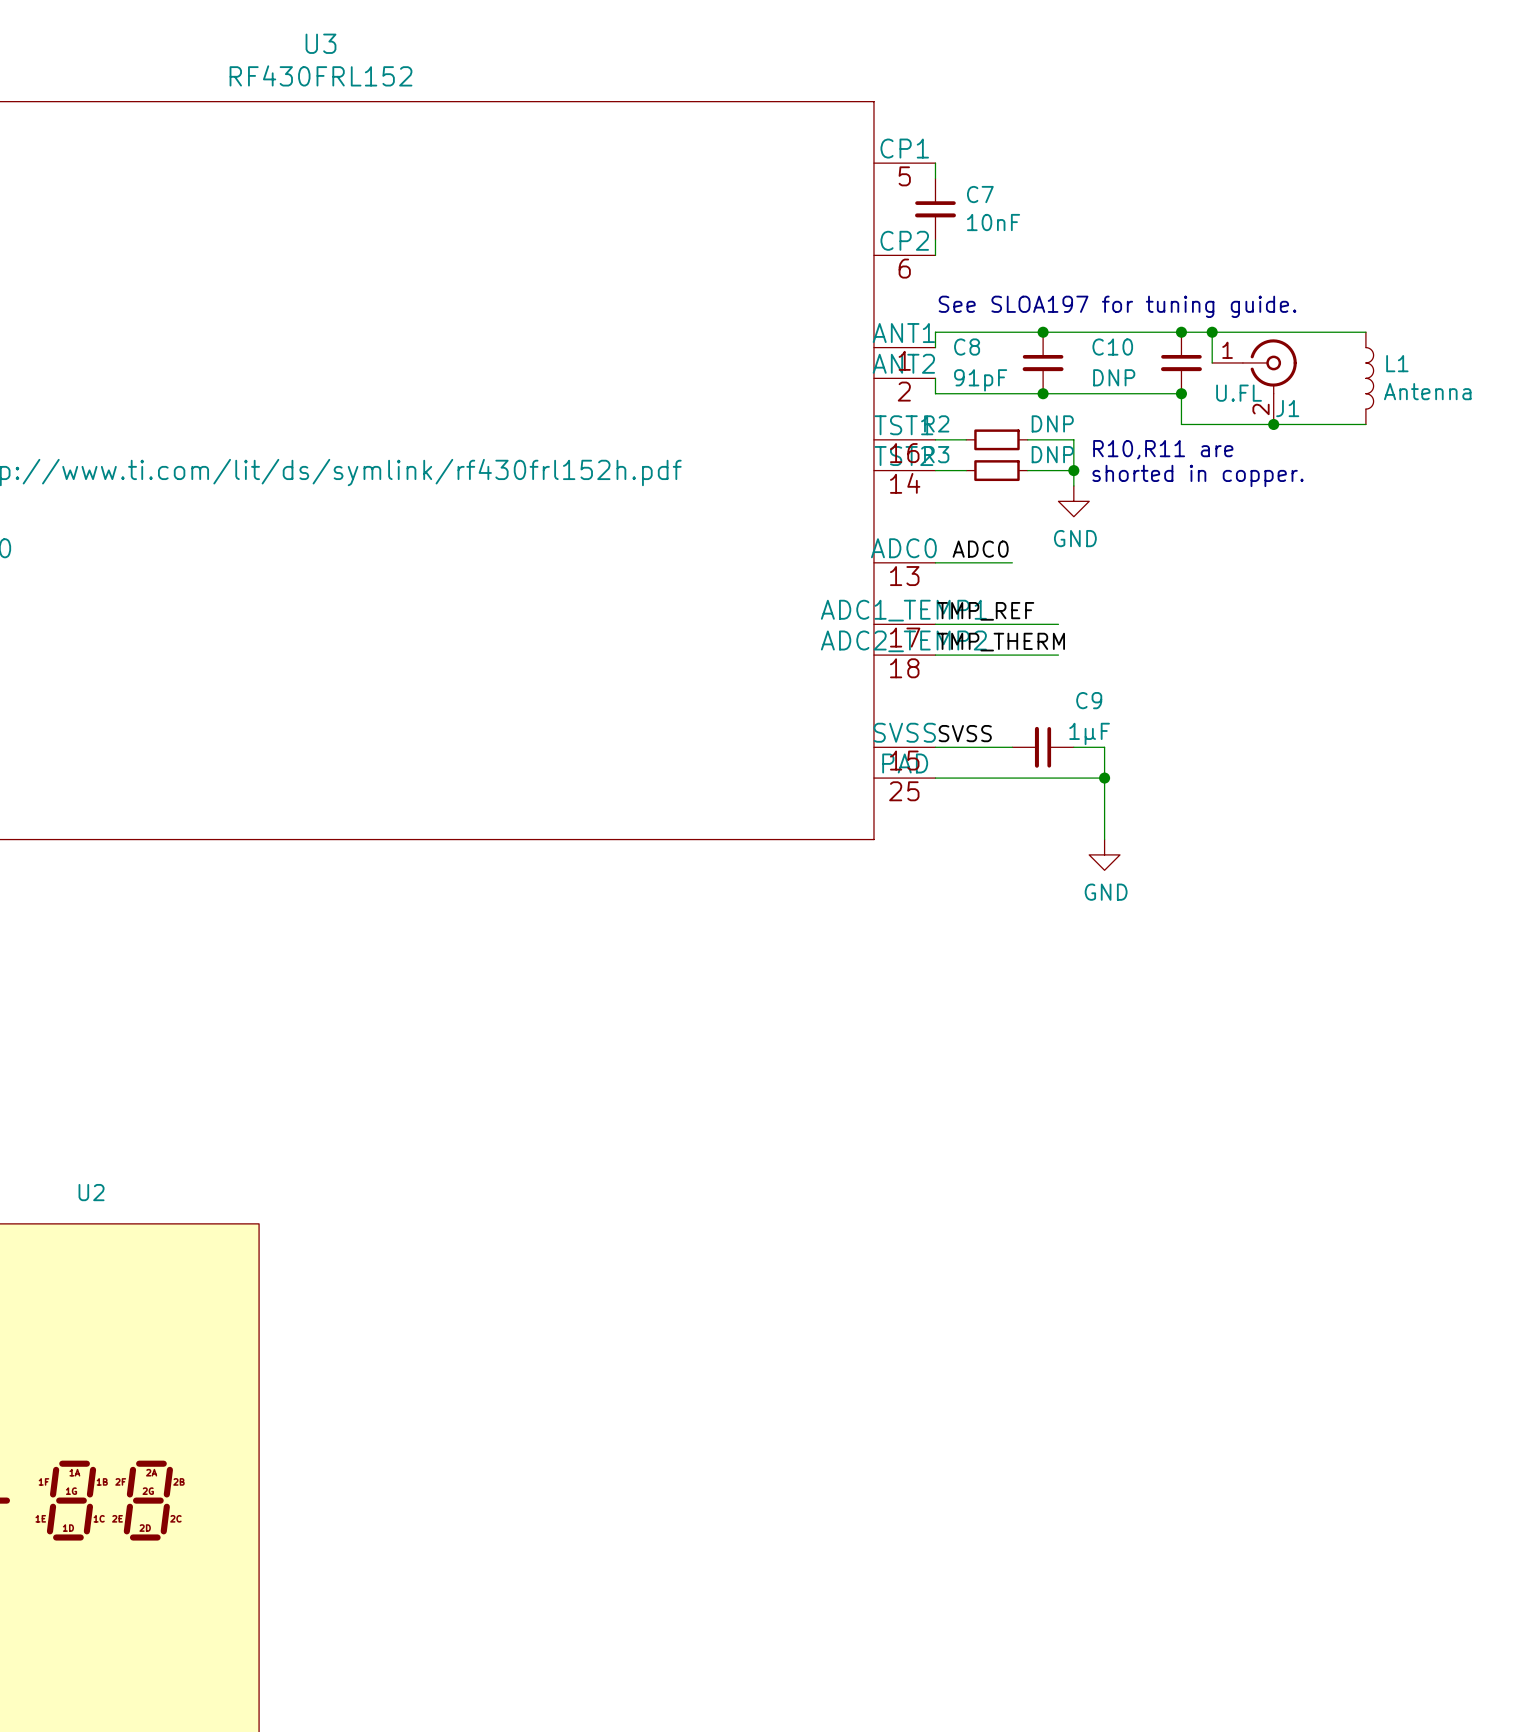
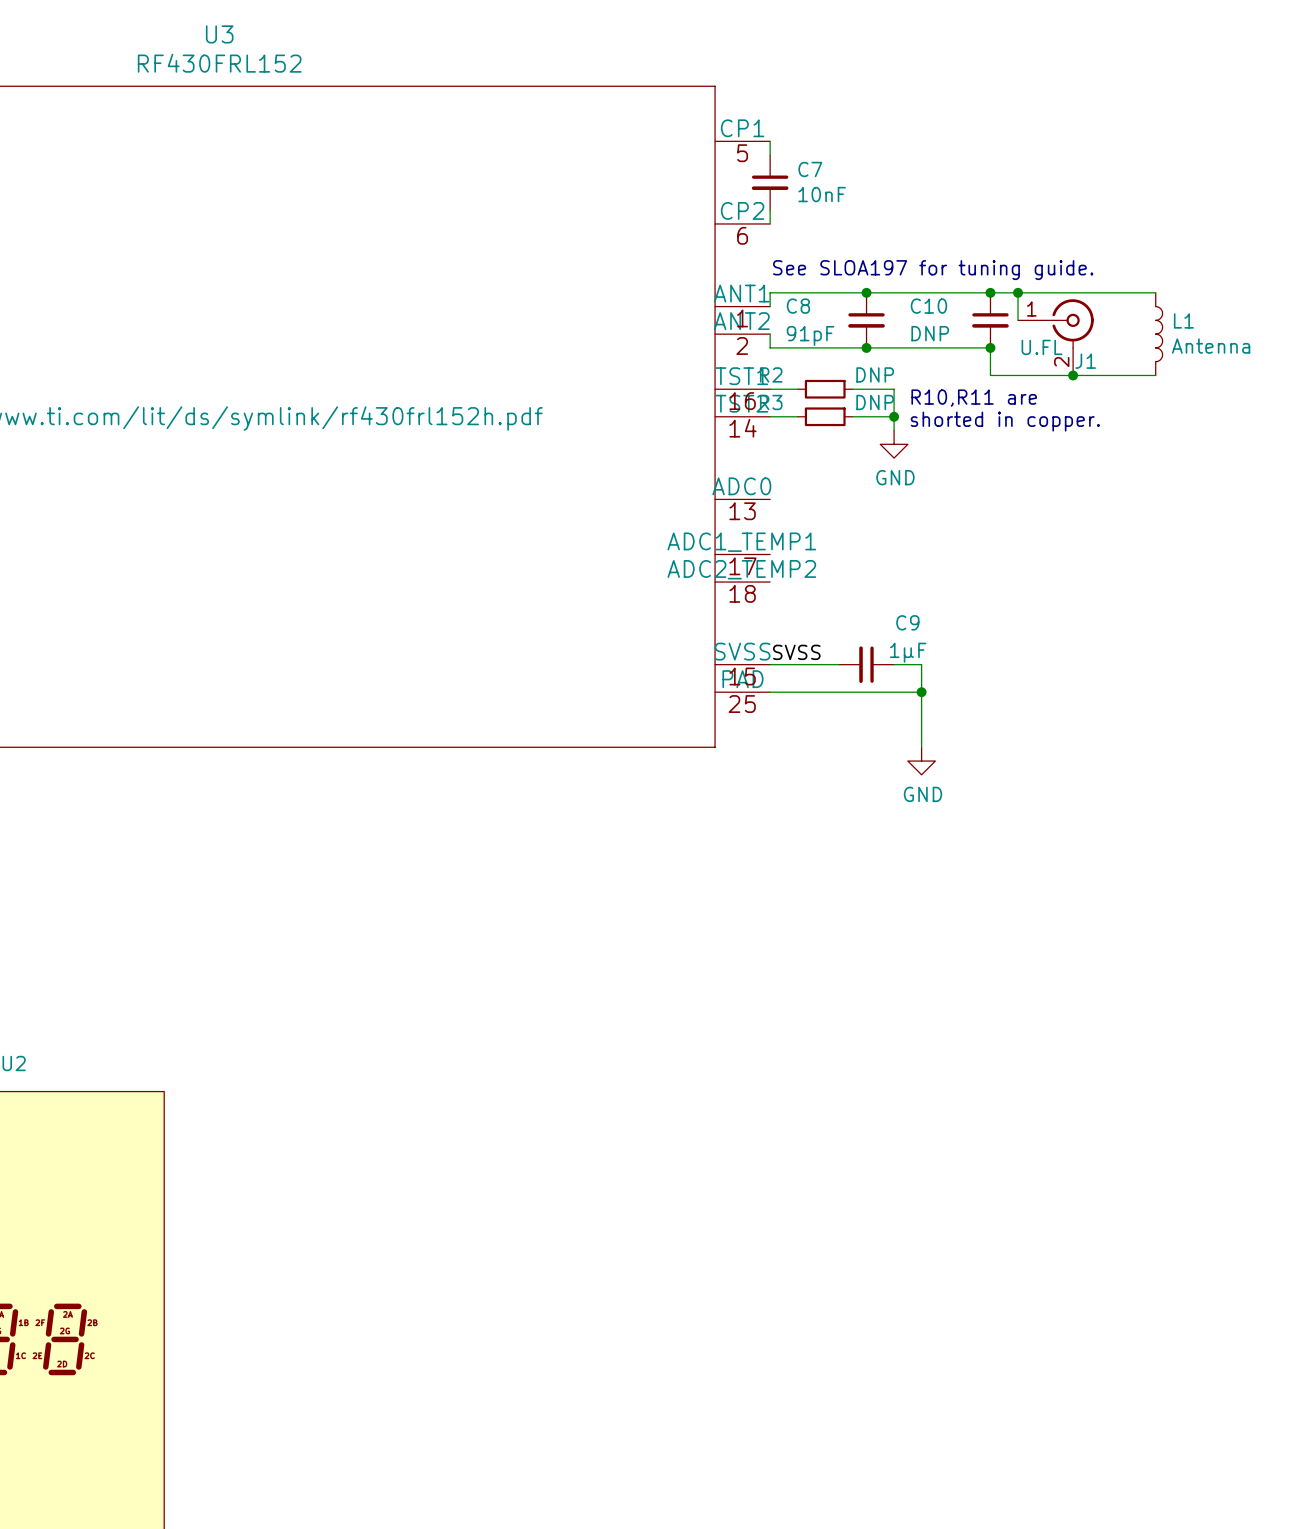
label: ADC0 (980, 549) -> none
wire: (935, 562) (1012, 562) -> none
label: TMP_REF (985, 611) -> none
wire: (935, 624) (1058, 624) -> none
label: TMP_THERM (1001, 642) -> none
wire: (935, 655) (1058, 655) -> none

